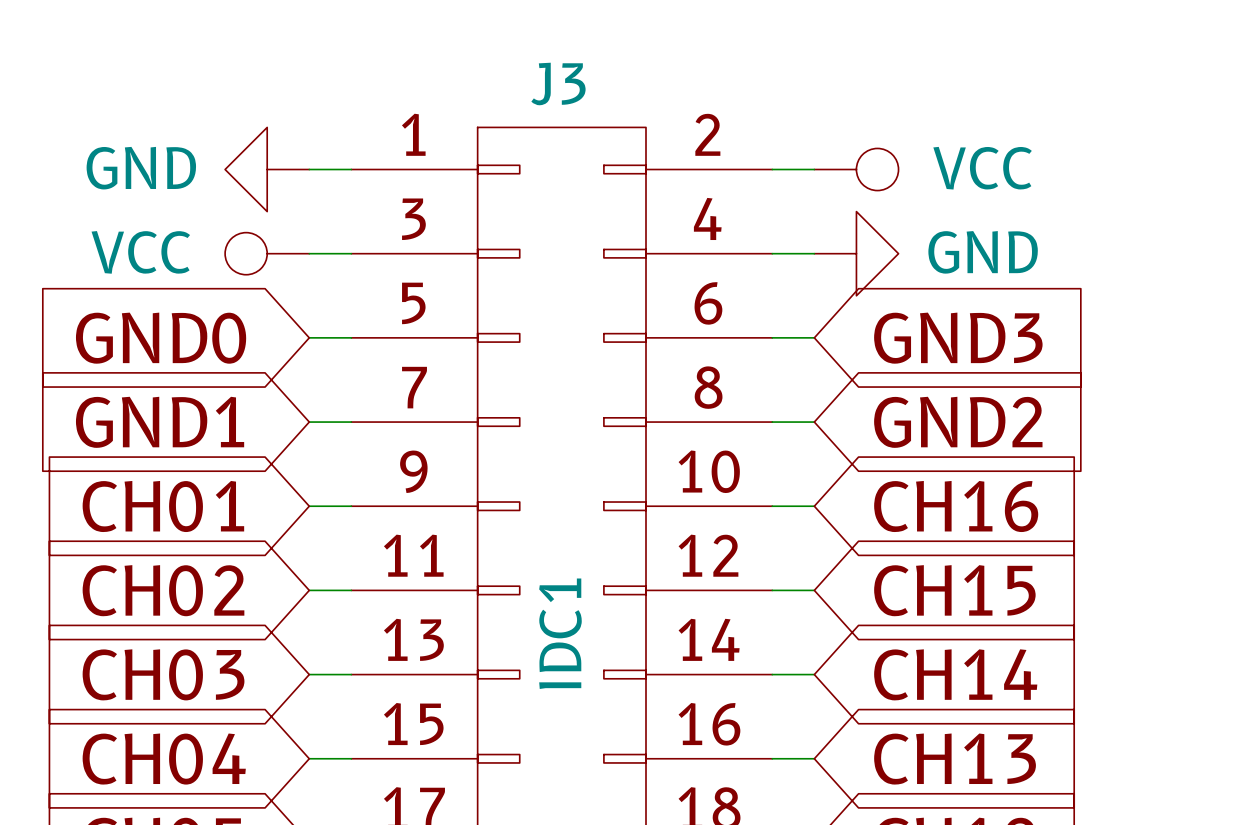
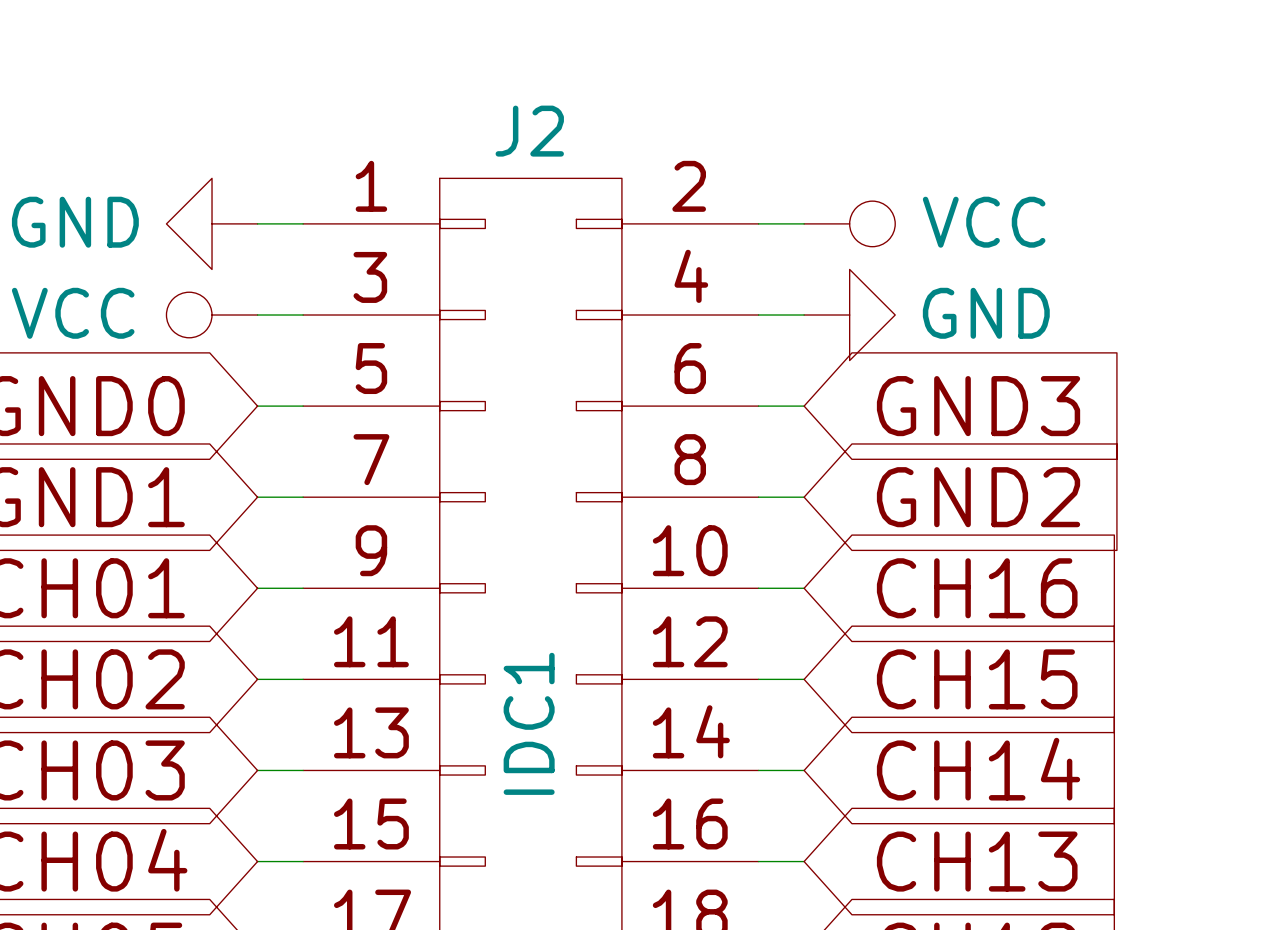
J3 name: J3 (558, 83) -> J2 (529, 131)

